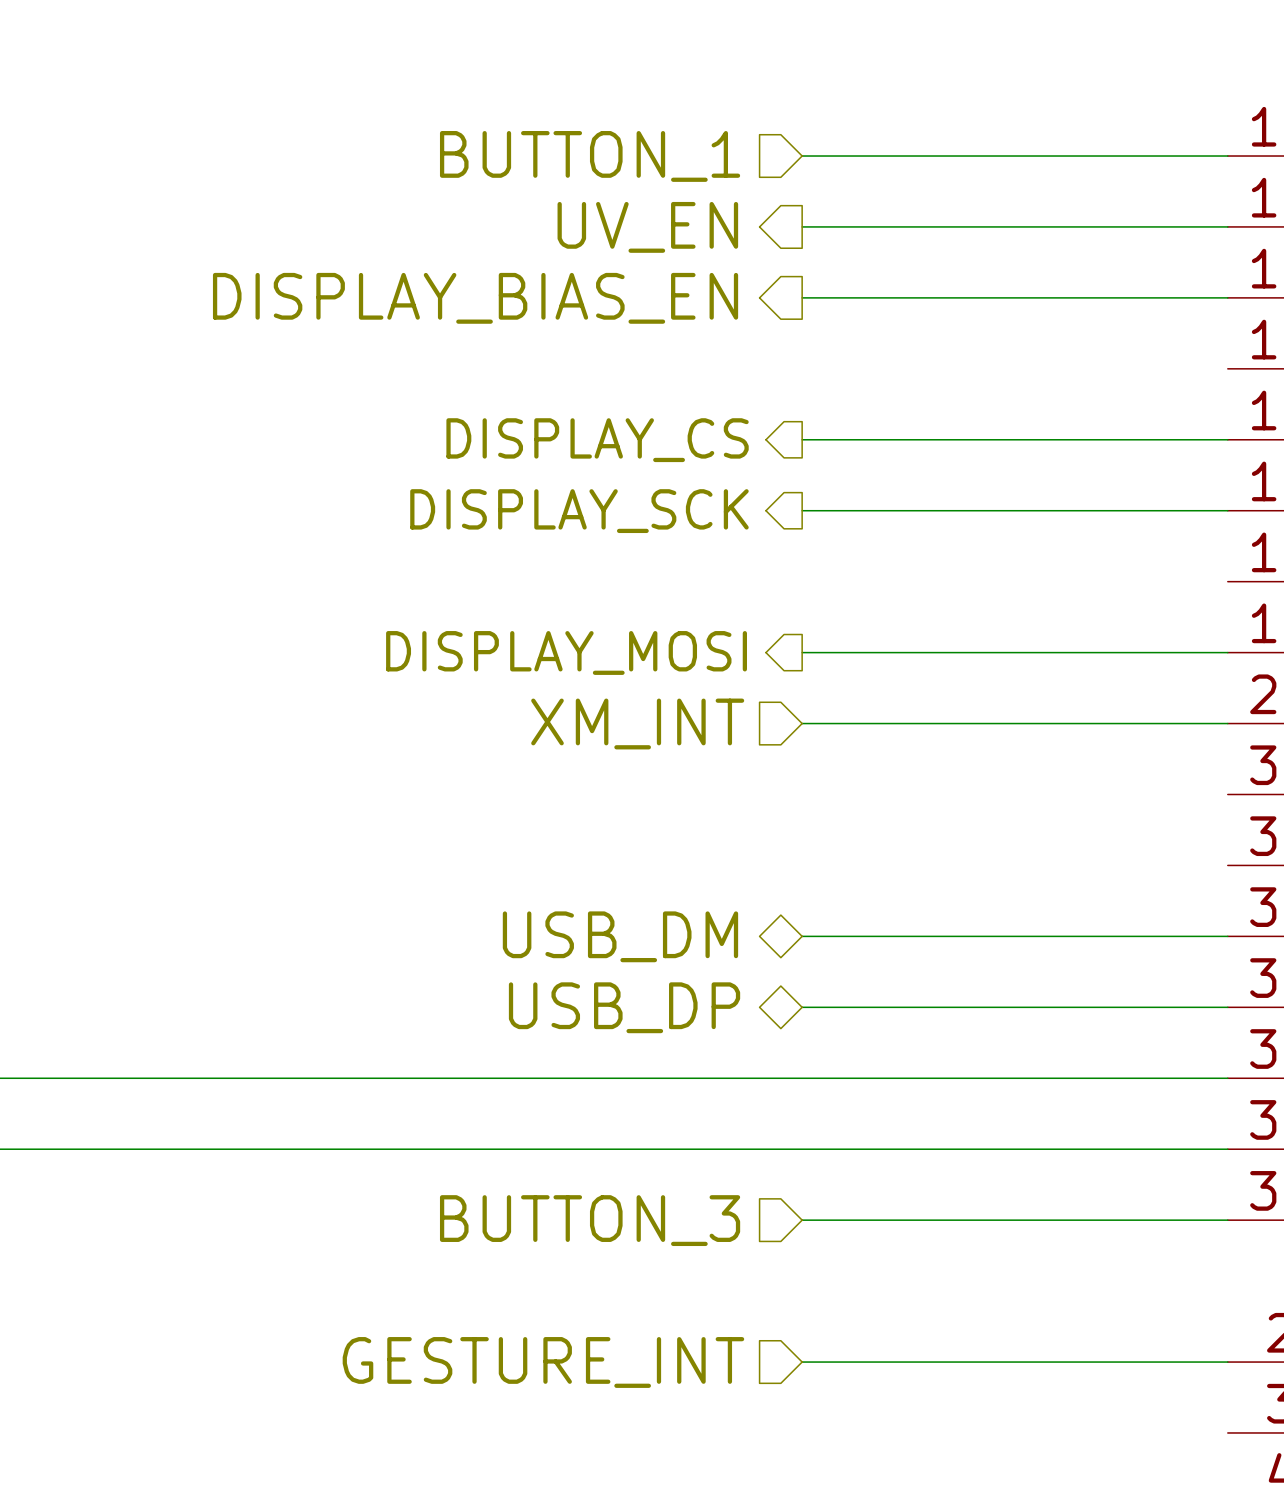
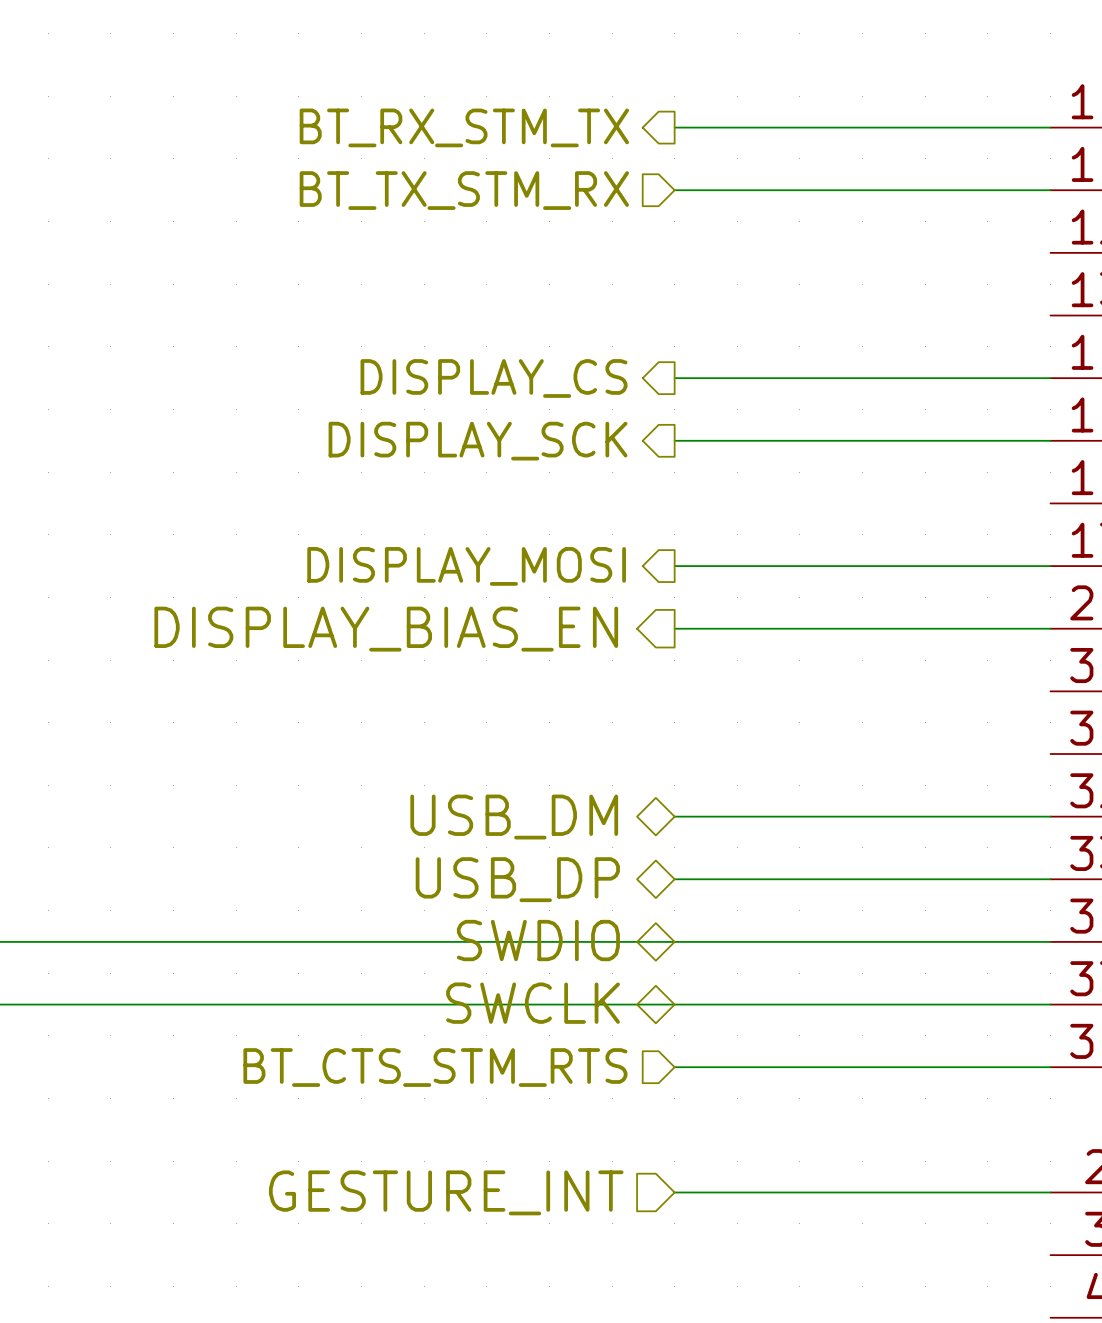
hierarchical label shape: input (590, 156) -> output (464, 127)
hierarchical label: BUTTON_1 (590, 156) -> BT_RX_STM_TX (464, 127)
hierarchical label shape: output (647, 227) -> input (464, 190)
hierarchical label: UV_EN (647, 227) -> BT_TX_STM_RX (464, 190)
wire: (802, 297) (1227, 297) -> none
hierarchical label: DISPLAY_BIAS_EN (475, 298) -> none
hierarchical label shape: input (637, 723) -> output (386, 629)
hierarchical label: XM_INT (637, 723) -> DISPLAY_BIAS_EN (386, 629)
hierarchical label: none -> SWDIO (538, 940)
hierarchical label: none -> SWCLK (533, 1003)
hierarchical label: BUTTON_3 (590, 1220) -> BT_CTS_STM_RTS (435, 1067)

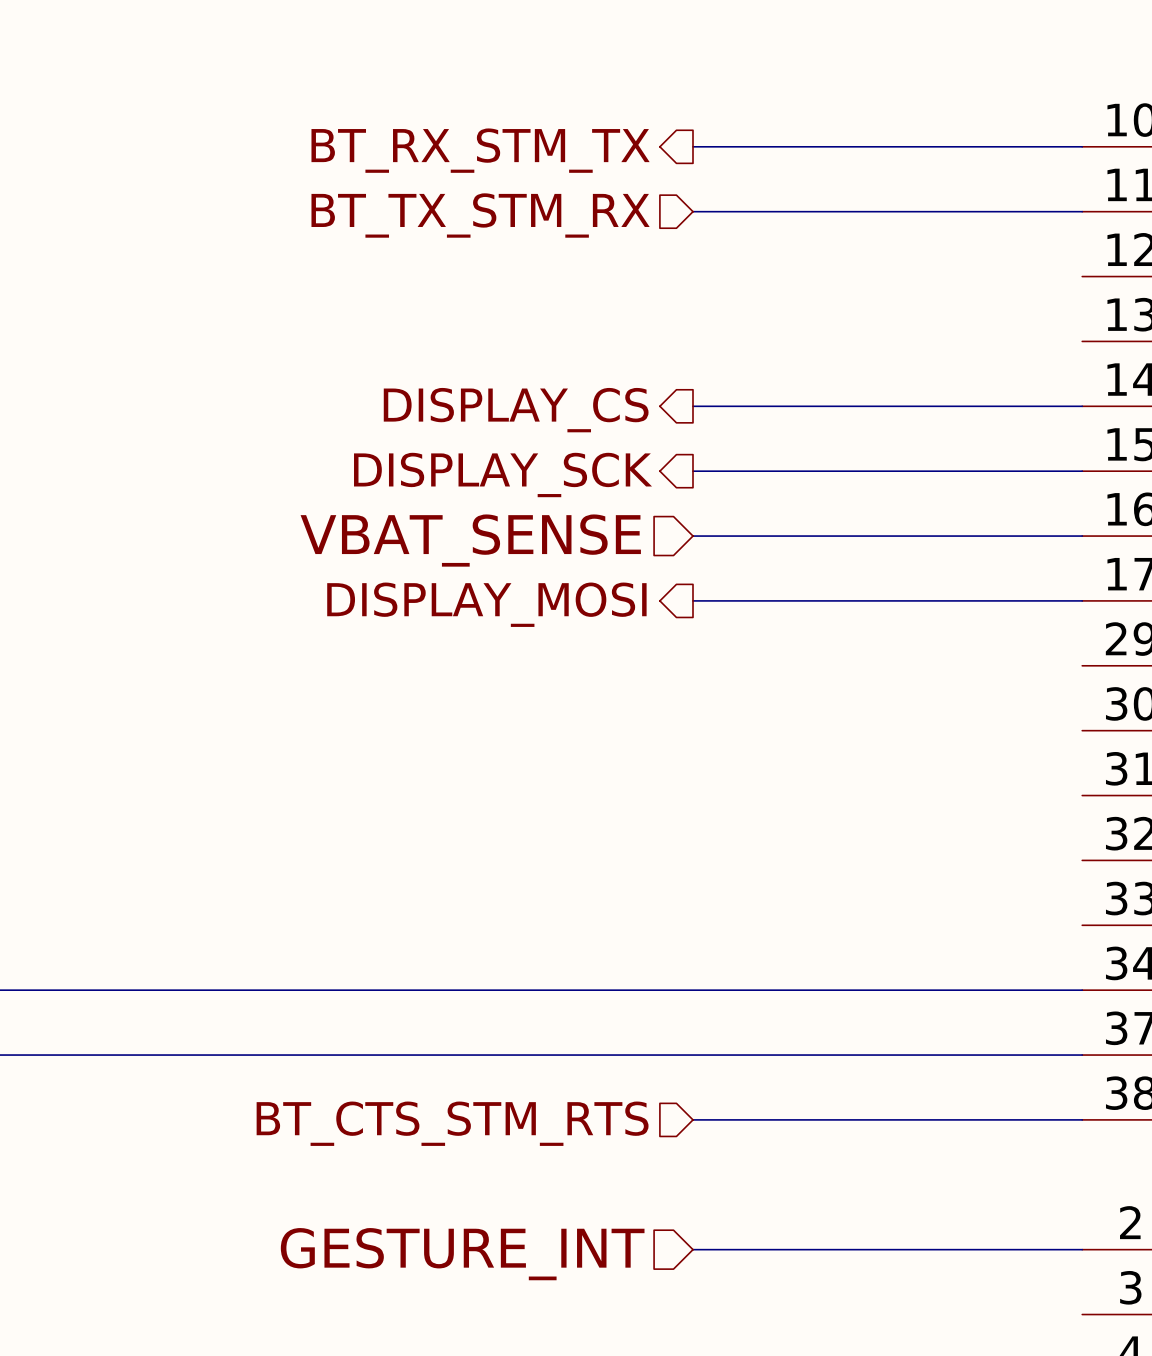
hierarchical label: none -> VBAT_SENSE (470, 540)
wire: (674, 628) (1050, 628) -> (692, 536) (1082, 536)
hierarchical label: DISPLAY_BIAS_EN (386, 629) -> none
wire: (674, 816) (1050, 816) -> none
hierarchical label: USB_DM (514, 817) -> none
hierarchical label: USB_DP (517, 879) -> none
wire: (674, 879) (1050, 879) -> none
hierarchical label: SWDIO (538, 940) -> none
hierarchical label: SWCLK (533, 1003) -> none

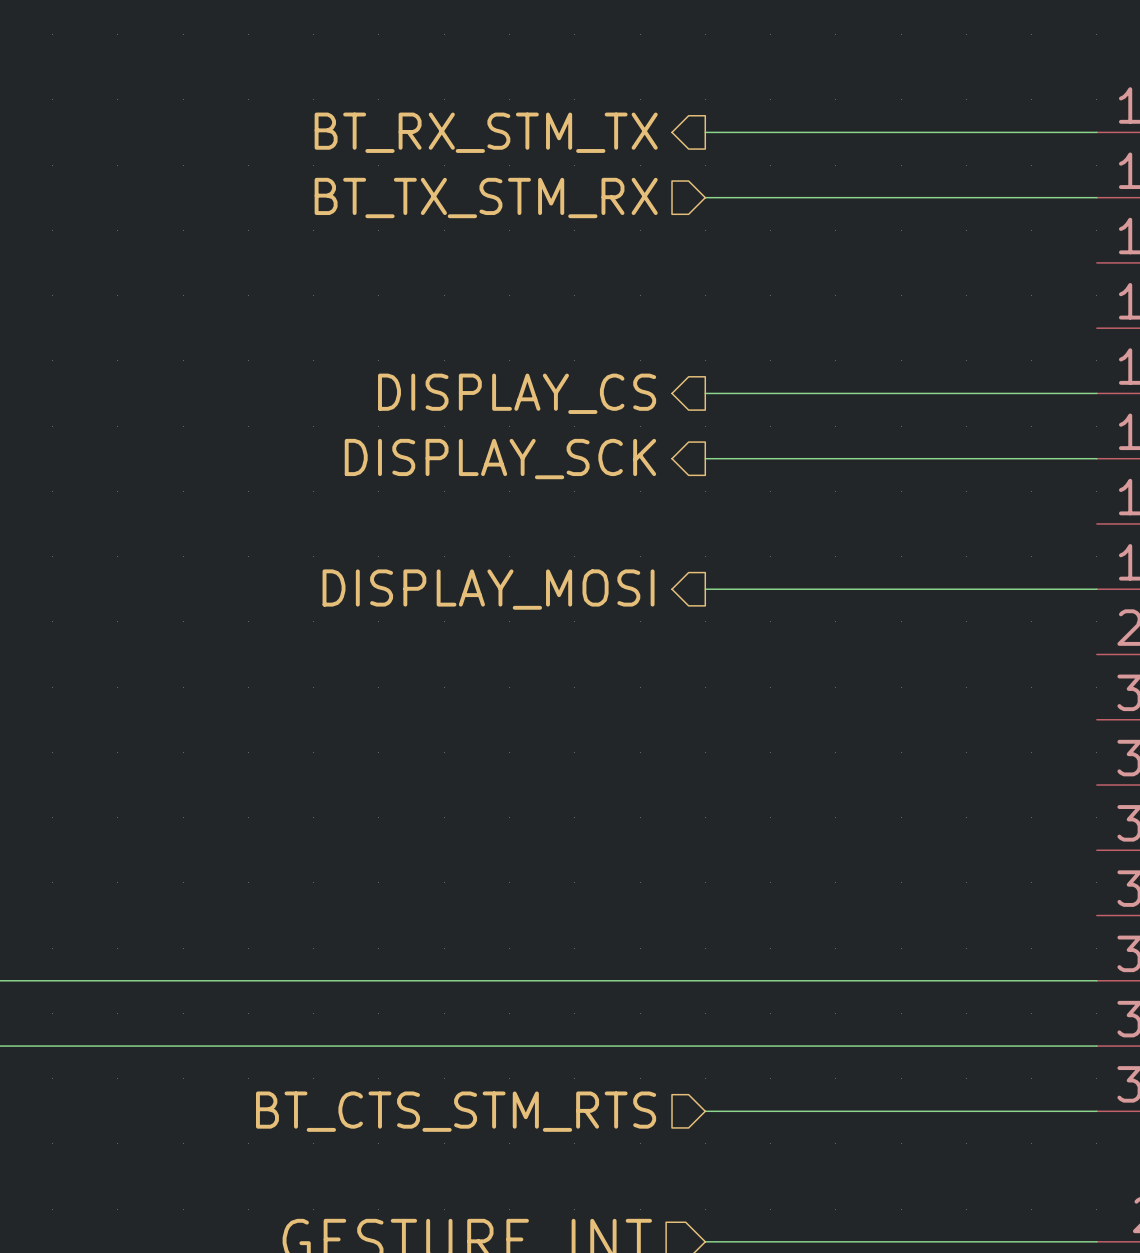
wire: (692, 536) (1082, 536) -> none
hierarchical label: VBAT_SENSE (470, 540) -> none

